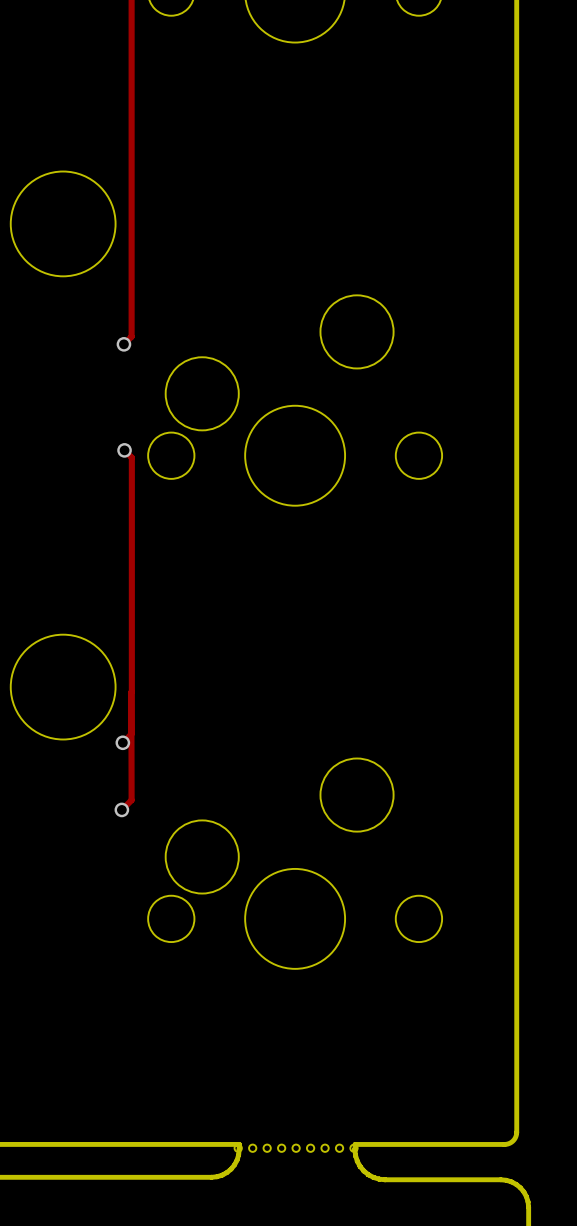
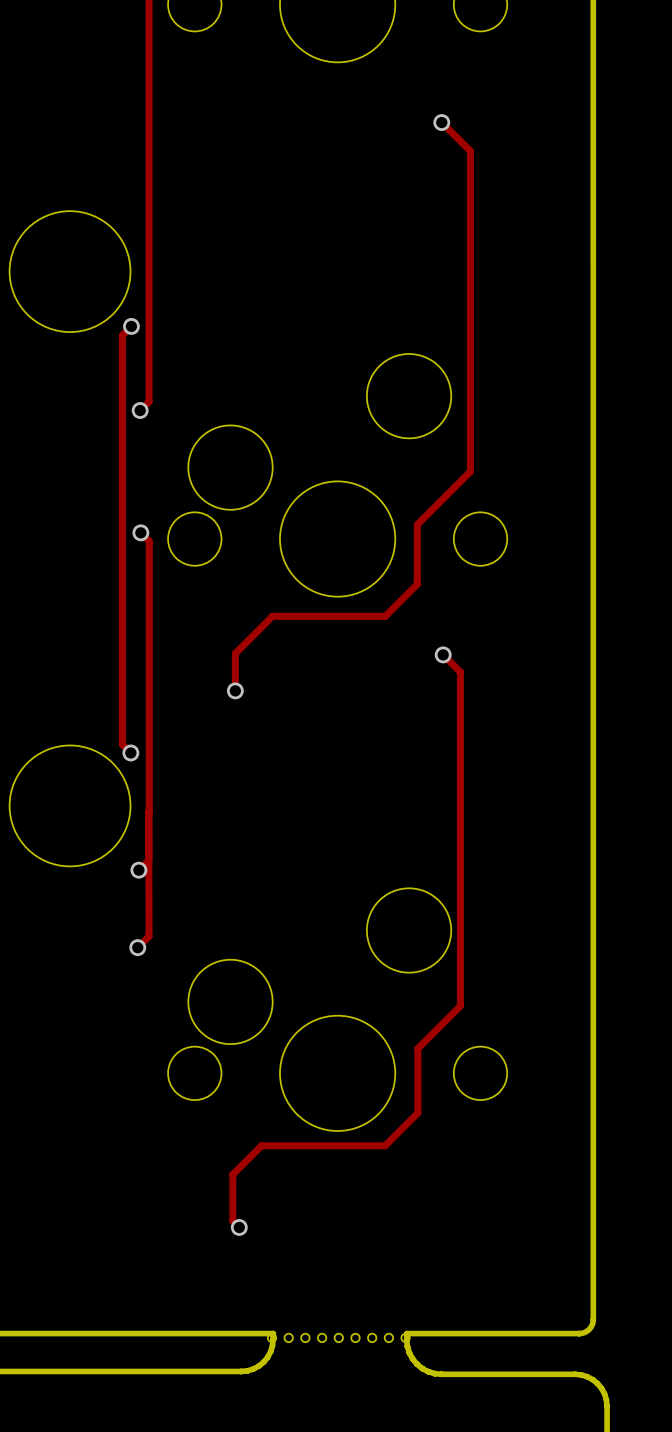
track: none -> (441, 122) (470, 151) (470, 471) (417, 524) (417, 584) (385, 616) (272, 616) (235, 653) (235, 690)
via: none -> (441, 122)
track: none -> (131, 326) (122, 335) (122, 744) (130, 752)
via: none -> (131, 326)
track: none -> (443, 654) (460, 672) (460, 1006) (417, 1048) (417, 1113) (385, 1145) (261, 1145) (232, 1174) (232, 1221) (239, 1227)
via: none -> (443, 654)
via: none -> (235, 690)
via: none -> (130, 752)
via: none -> (239, 1227)

